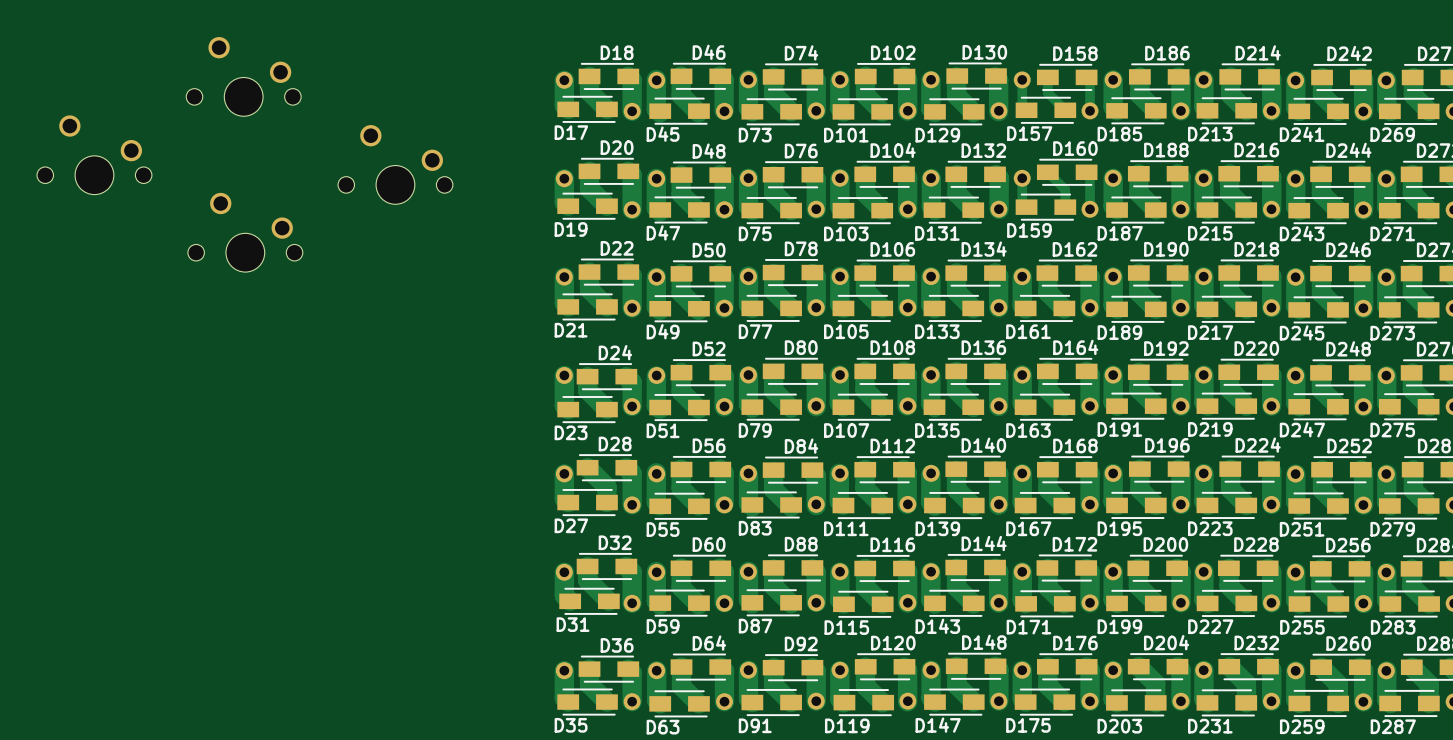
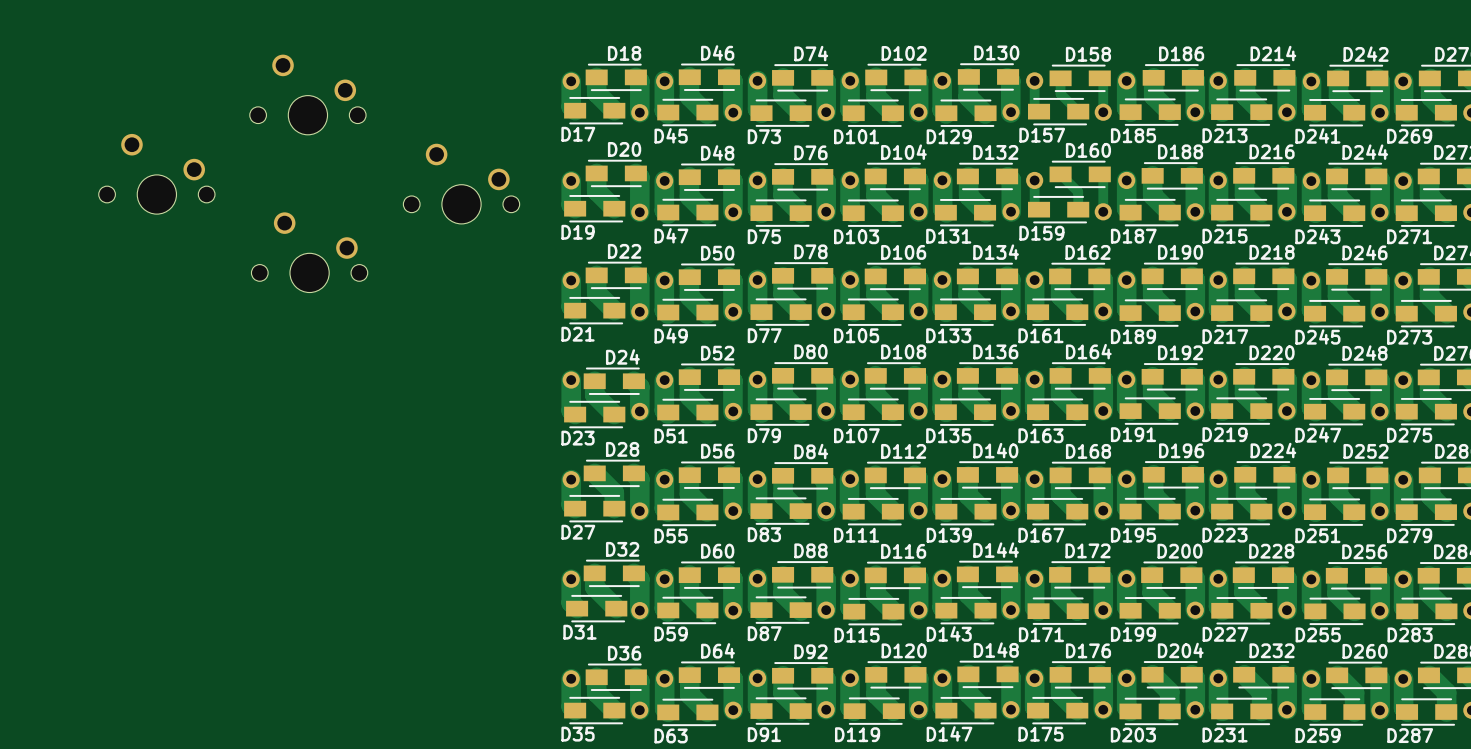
part: (243, 76) -> none
part: none -> (307, 94)
part: (94, 154) -> none
part: (395, 164) -> none
part: none -> (156, 174)
part: none -> (461, 183)
part: (245, 232) -> none
part: none -> (309, 252)

